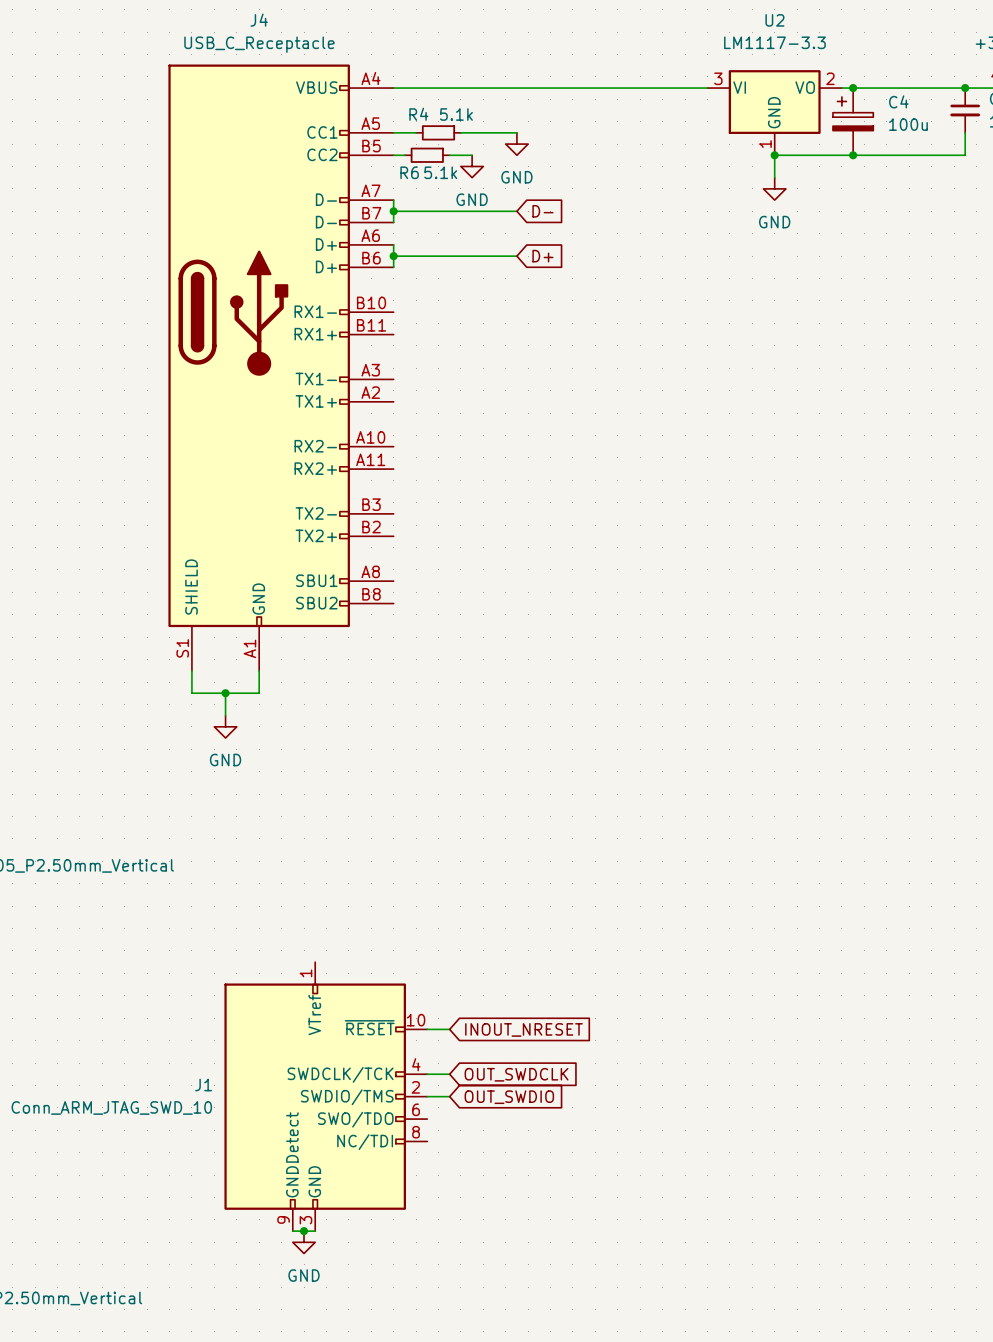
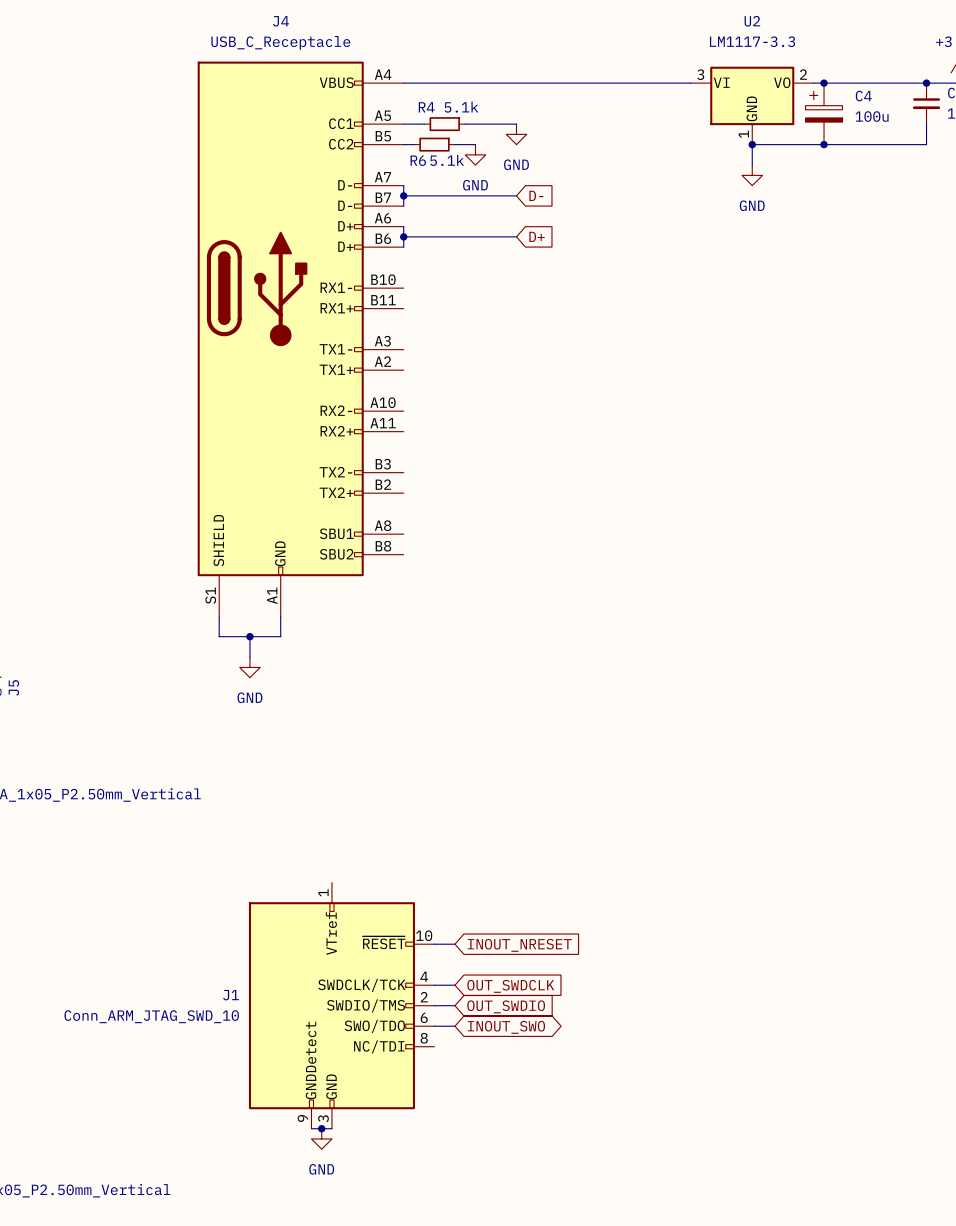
wire: none -> (434, 1026) (454, 1026)
global label: none -> INOUT_SWO (506, 1027)

